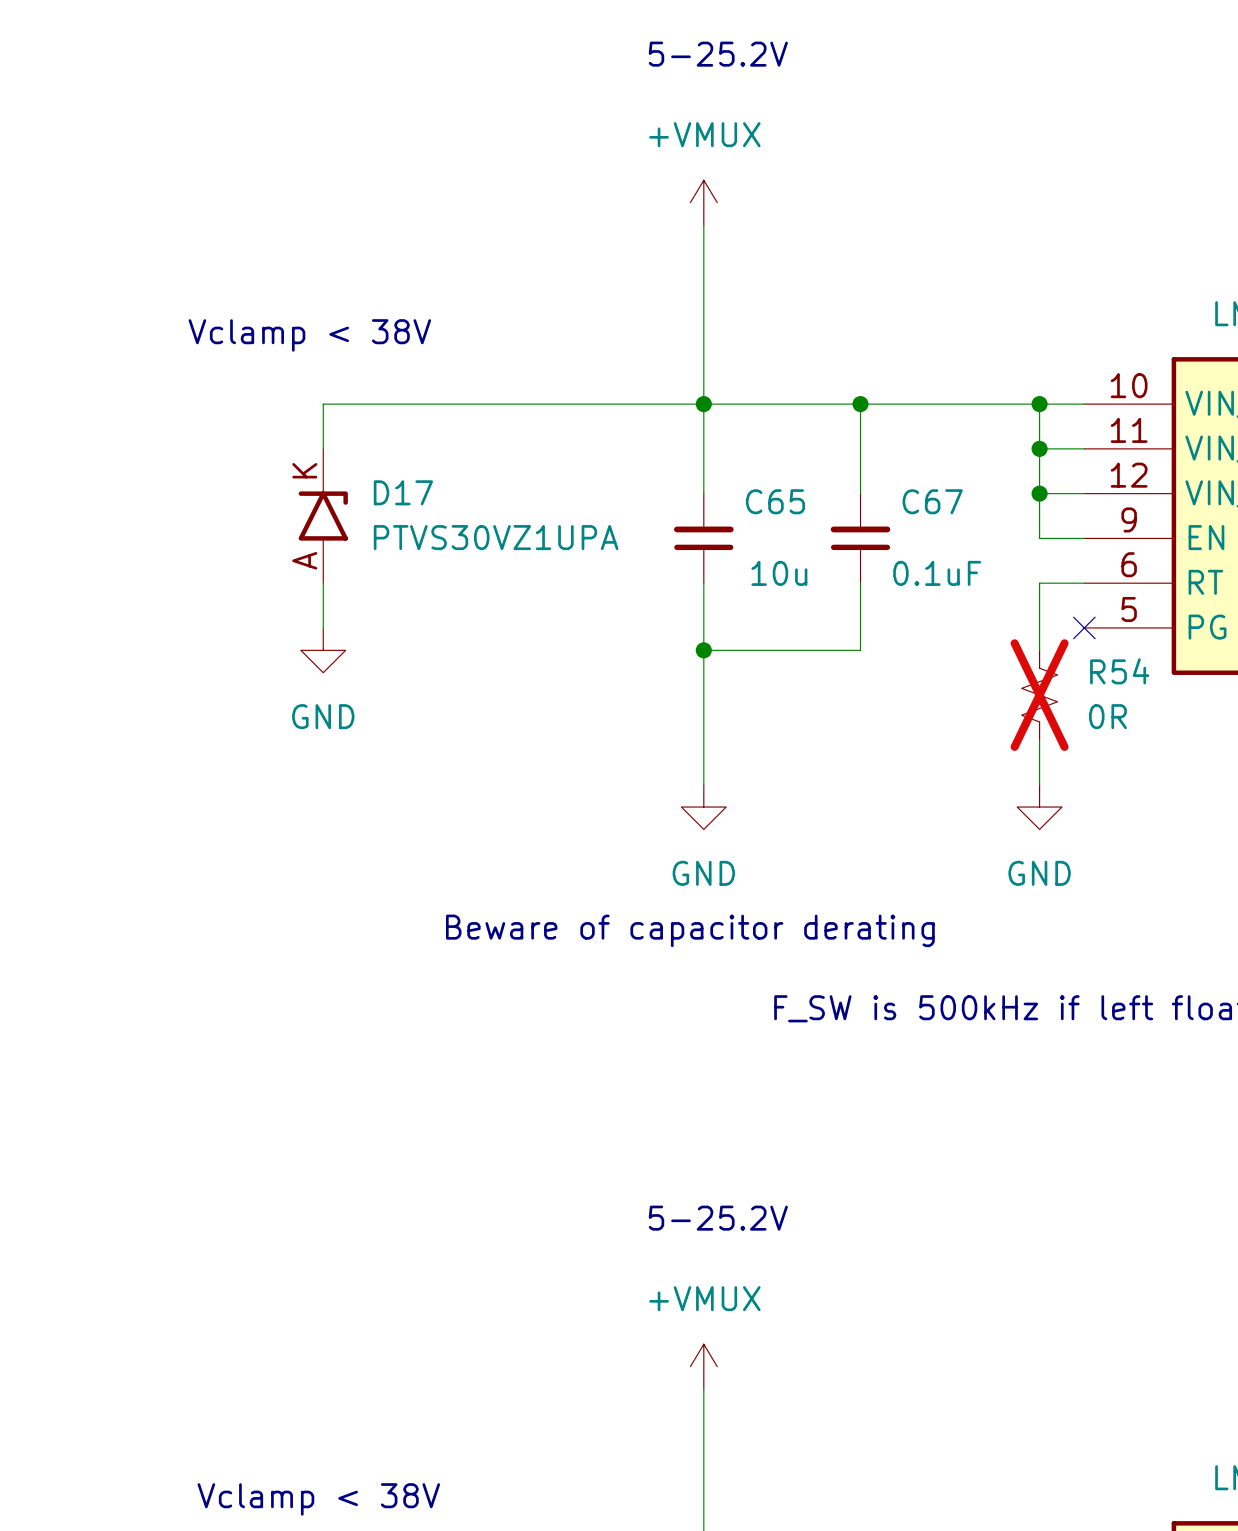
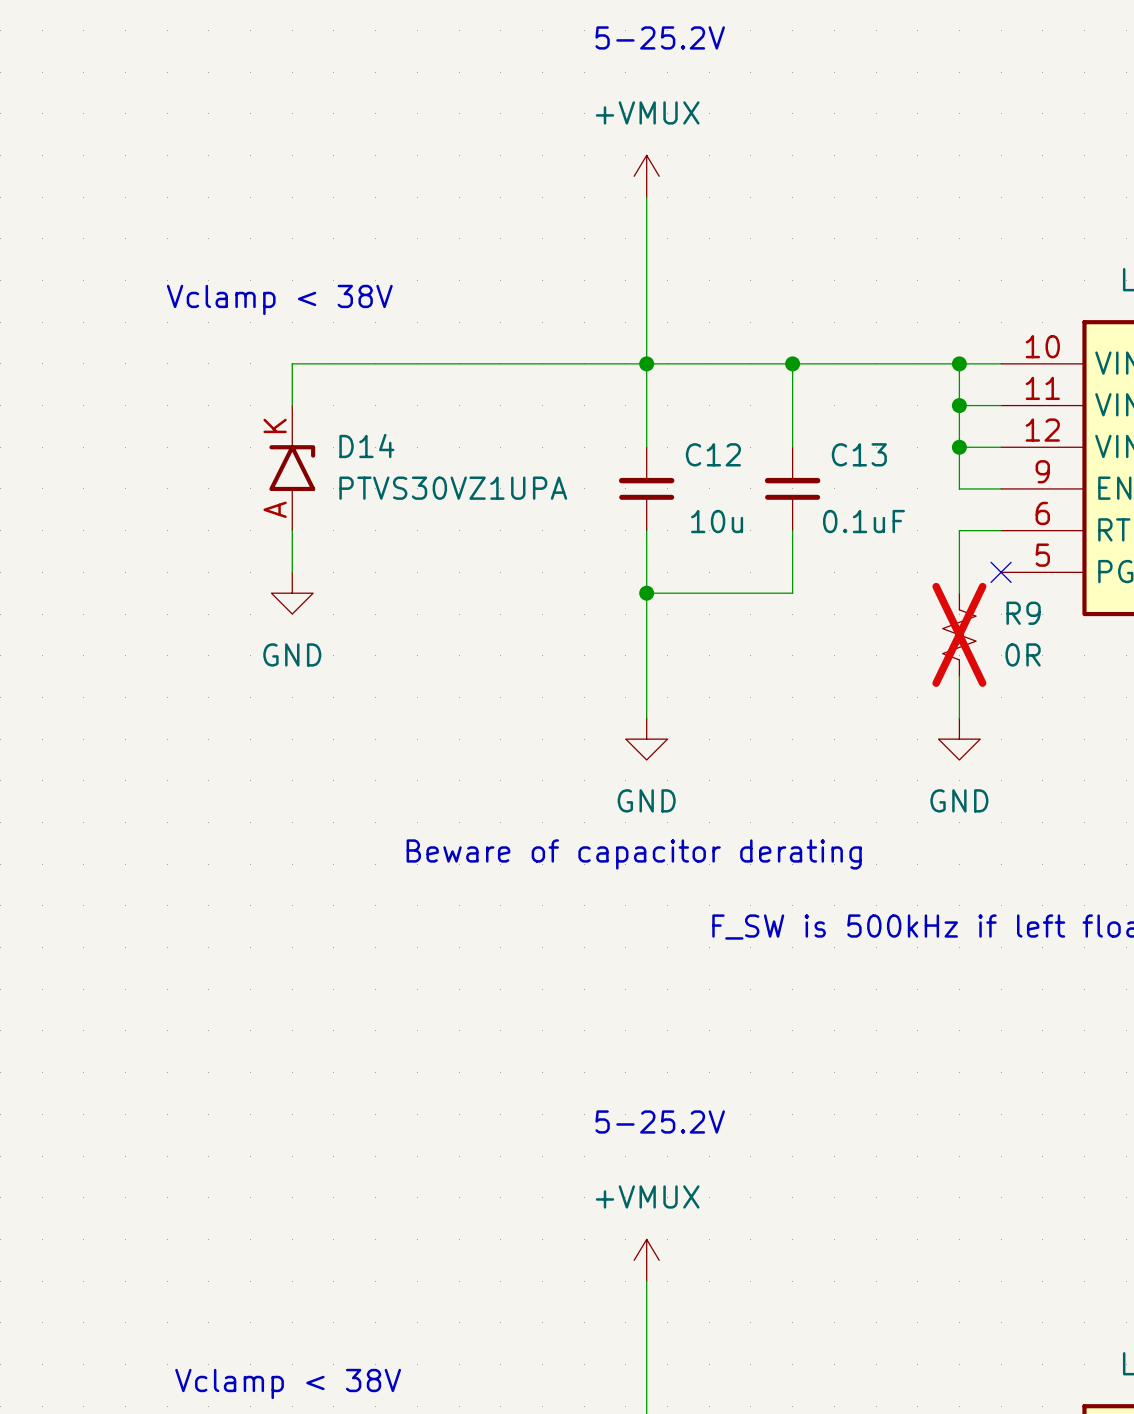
D17 name: D17 (403, 492) -> D14 (366, 445)
C65 name: C65 (775, 501) -> C12 (713, 454)
C67 name: C67 (932, 501) -> C13 (859, 454)
R54 name: R54 (1119, 671) -> R9 (1023, 613)

